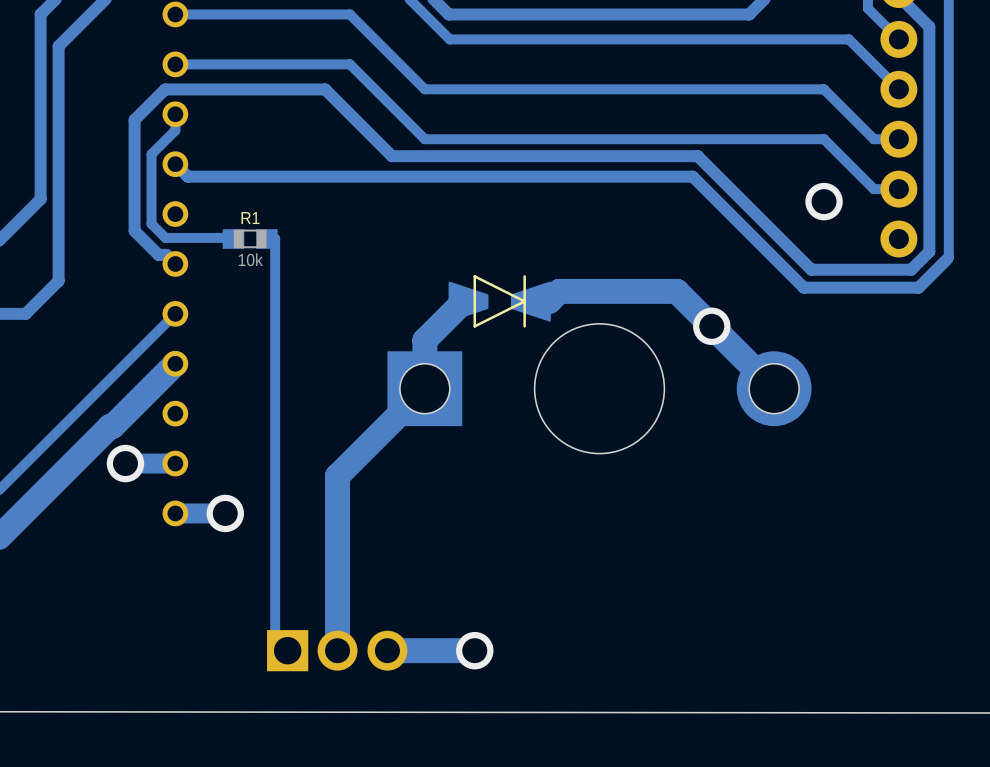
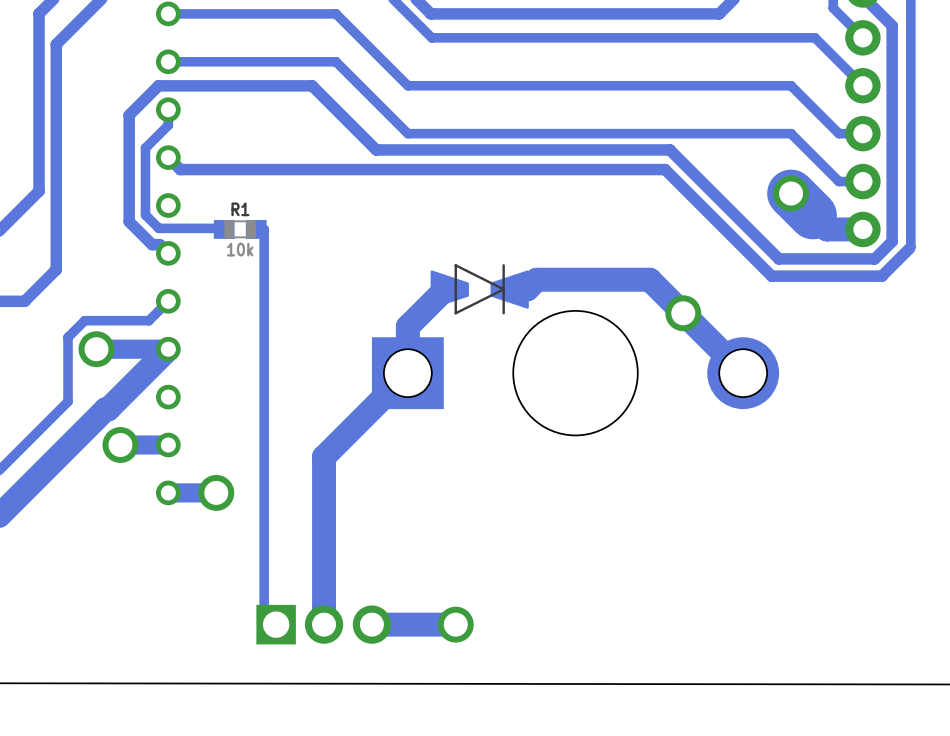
track: none -> (812, 215) (791, 193) (826, 229) (862, 229)
track: (155, 334) (70, 418) -> (148, 320) (84, 320) (68, 337) (68, 401)
via: none -> (96, 349)
track: none -> (168, 349) (96, 349)

